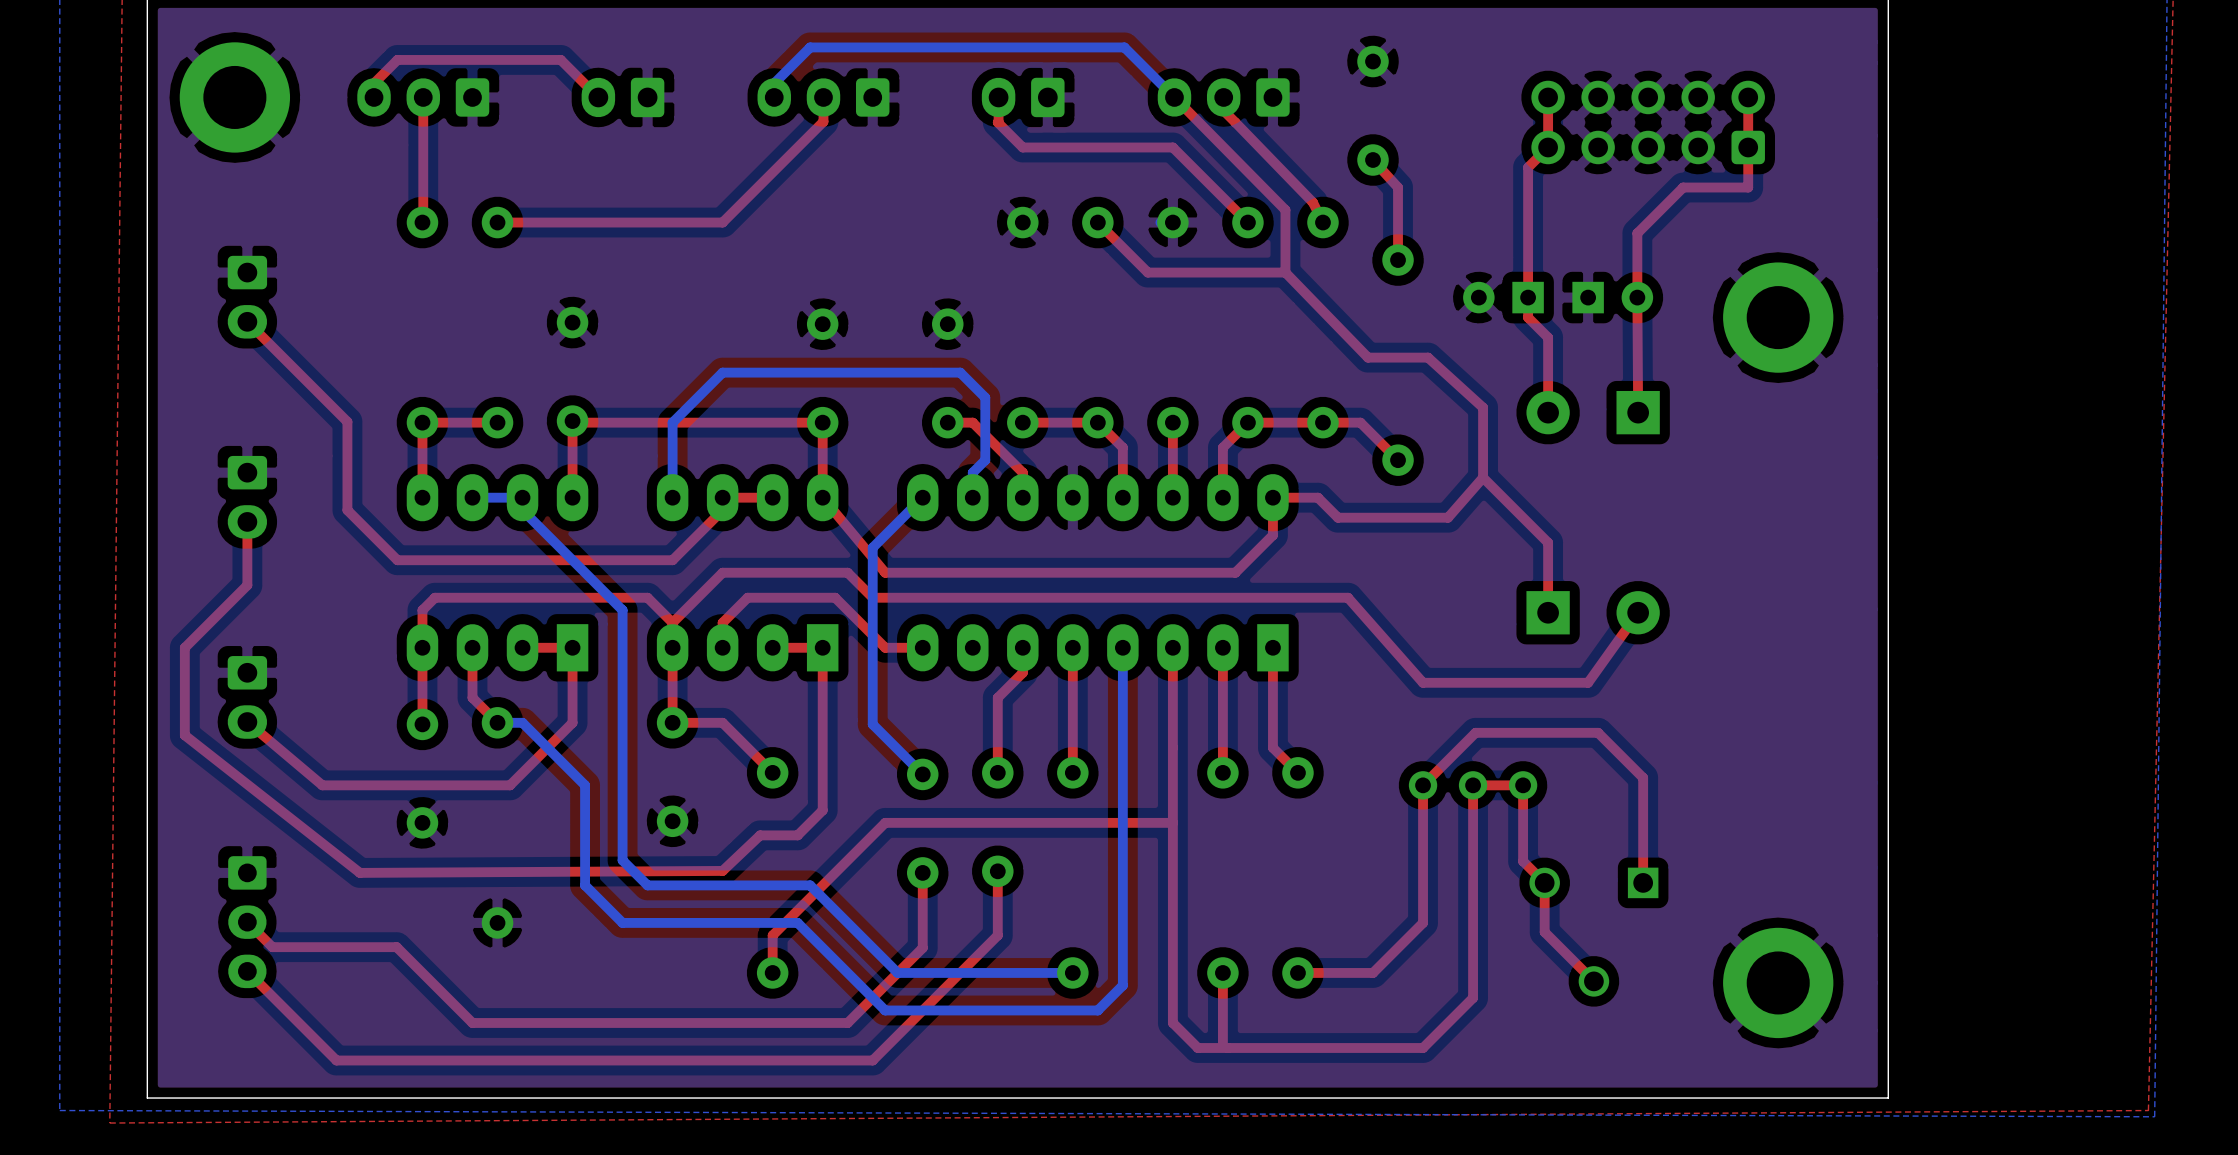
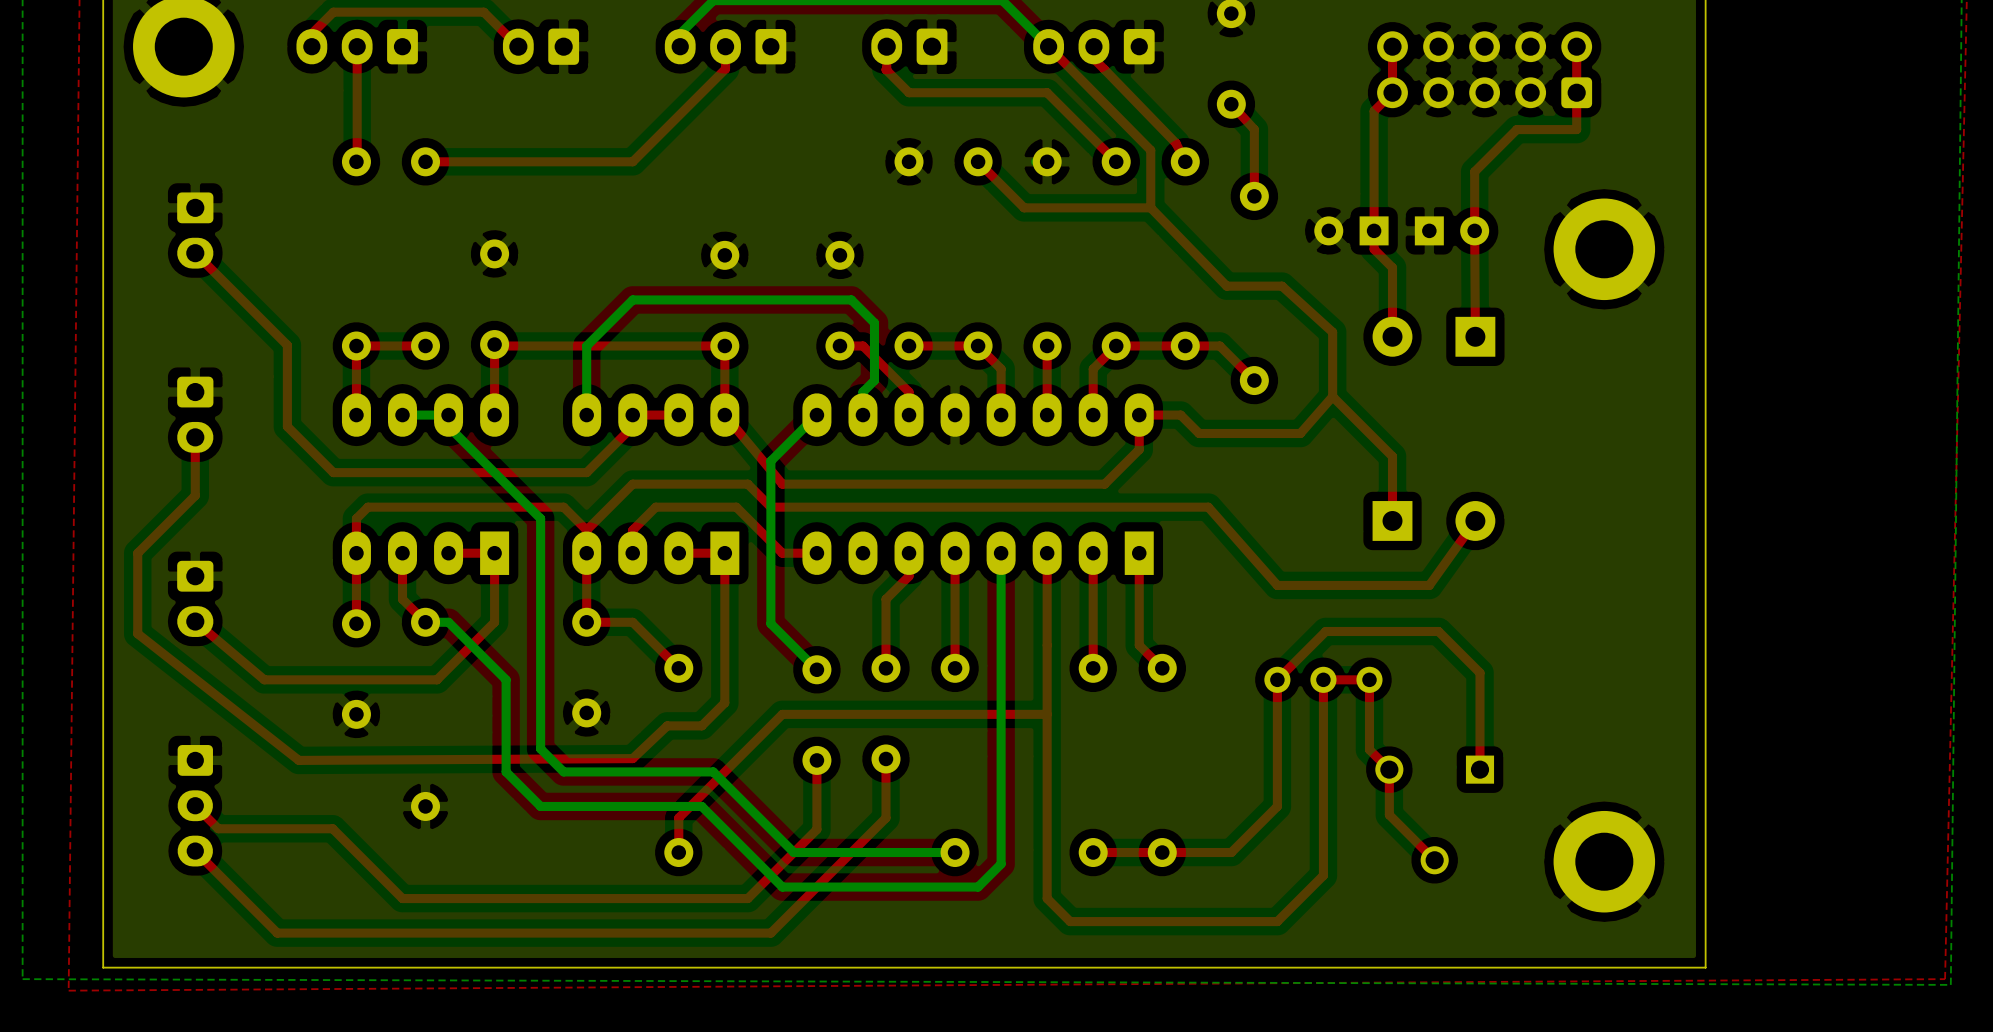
top track: (1222, 972) (1222, 1042) (1227, 1047) -> (1093, 852) (1162, 852)

